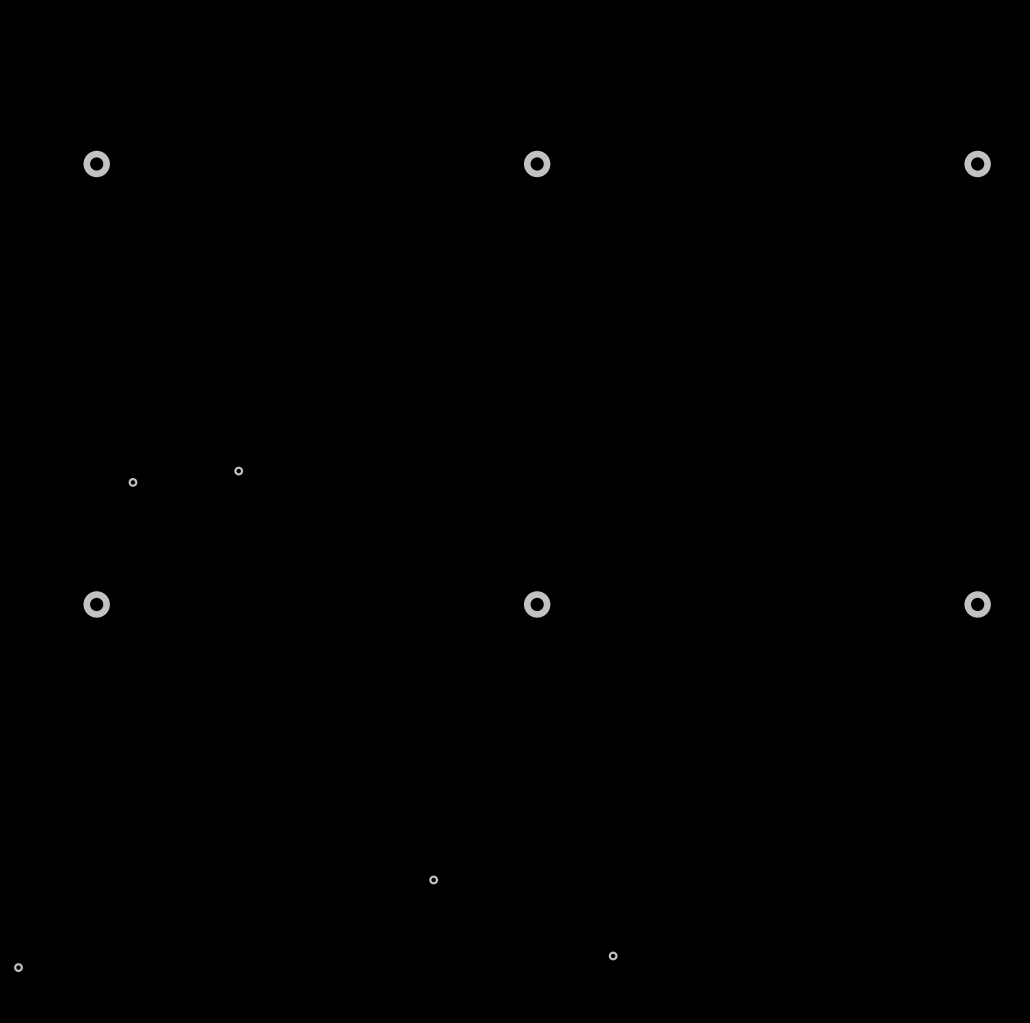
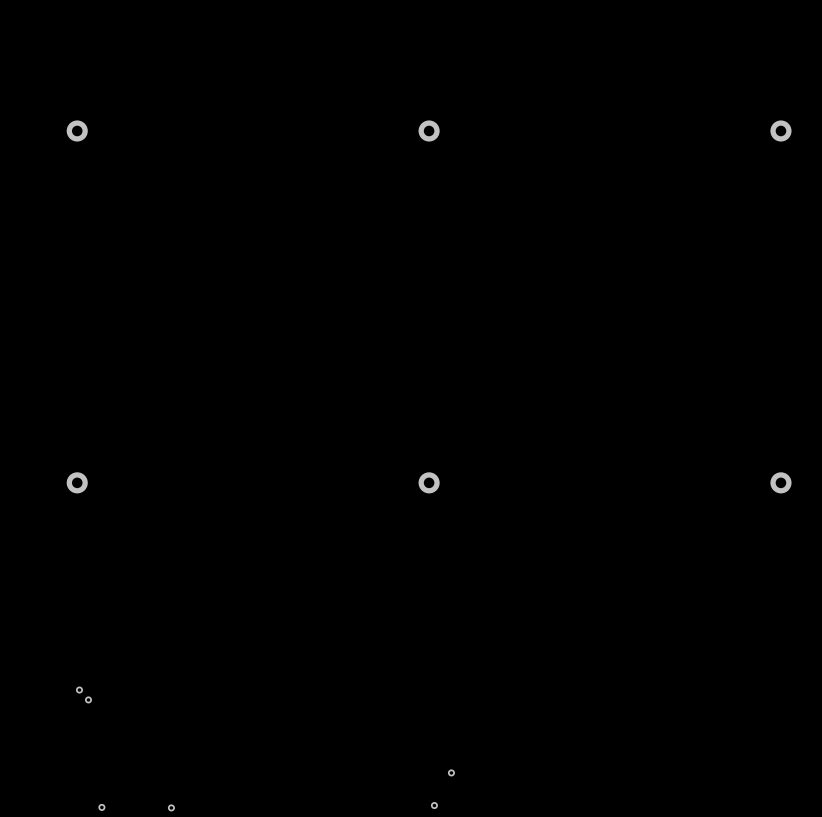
via: (238, 471) -> none
via: (132, 482) -> none
via: none -> (79, 690)
via: none -> (88, 699)
via: (433, 879) -> none
via: (613, 955) -> none
via: (18, 967) -> none
via: none -> (451, 772)
via: none -> (434, 805)
via: none -> (101, 807)
via: none -> (171, 807)

